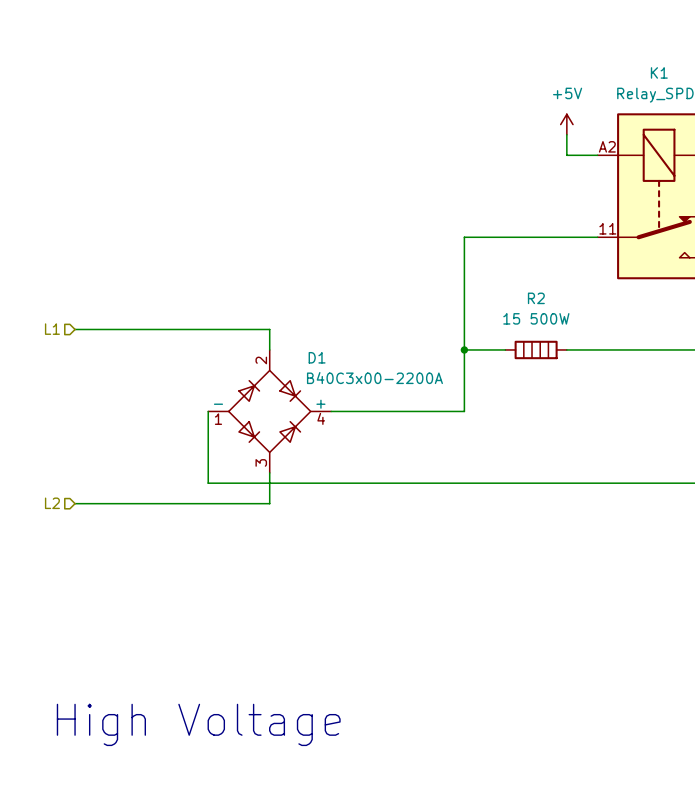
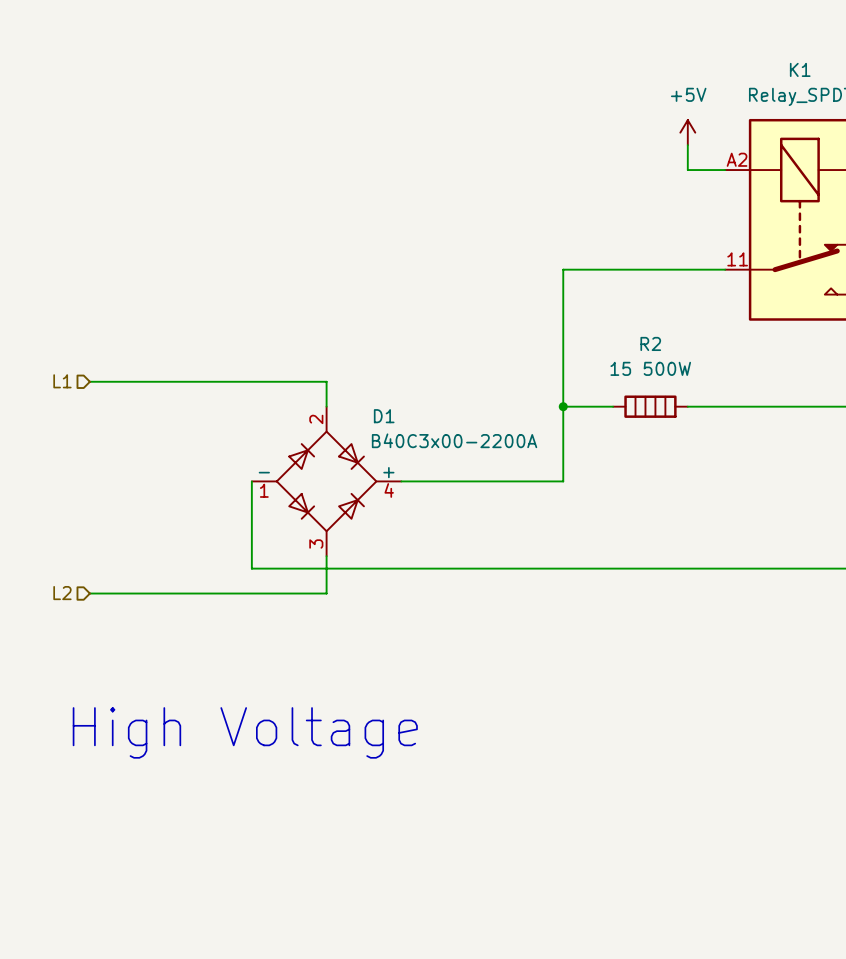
text position: High Voltage (198, 724) -> High Voltage (245, 732)

